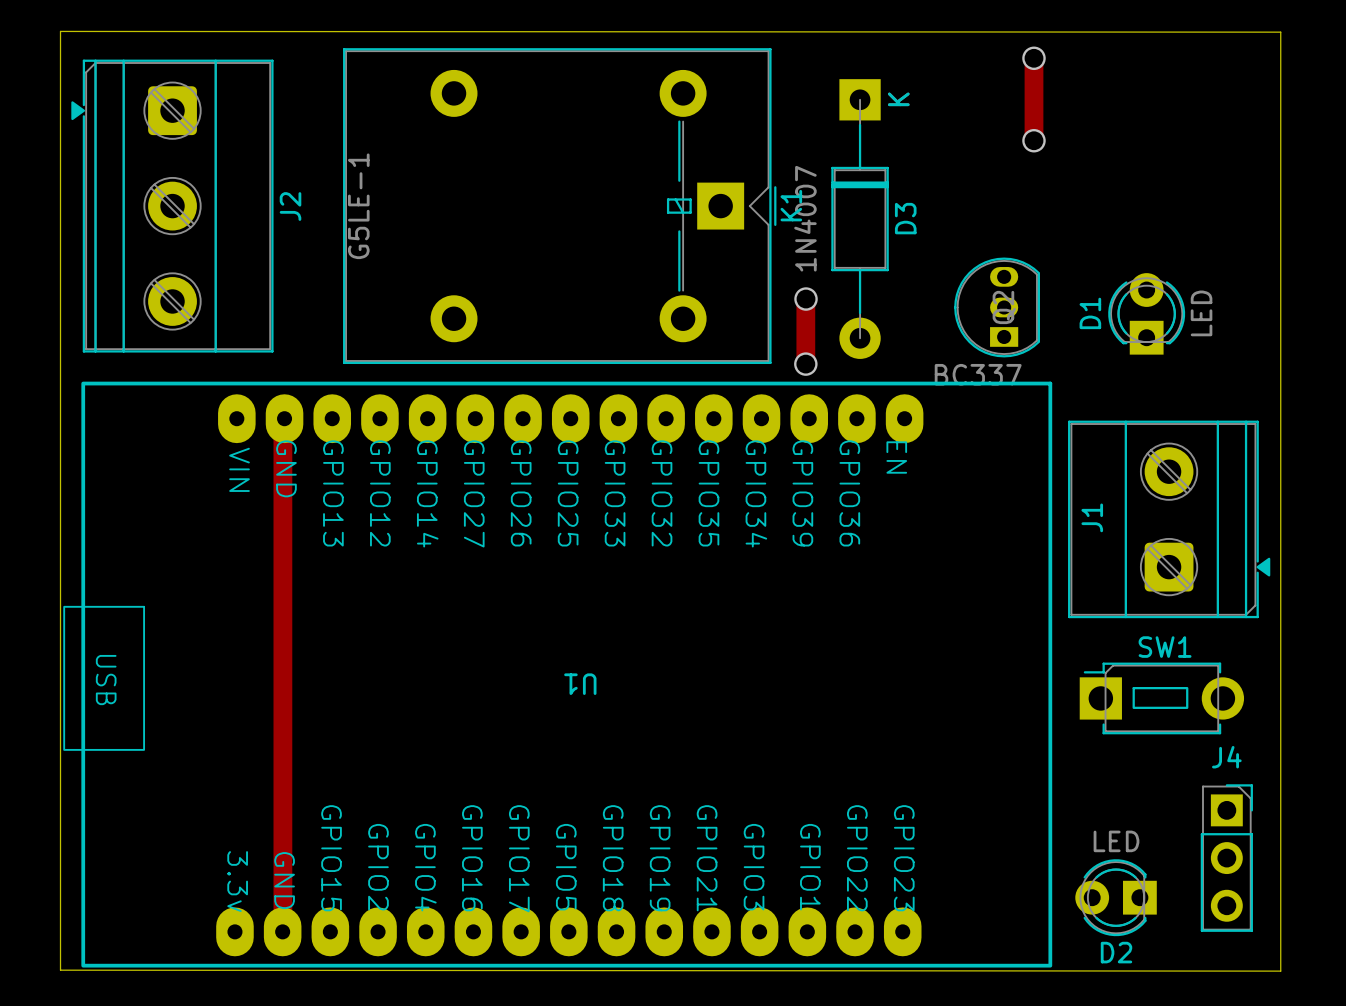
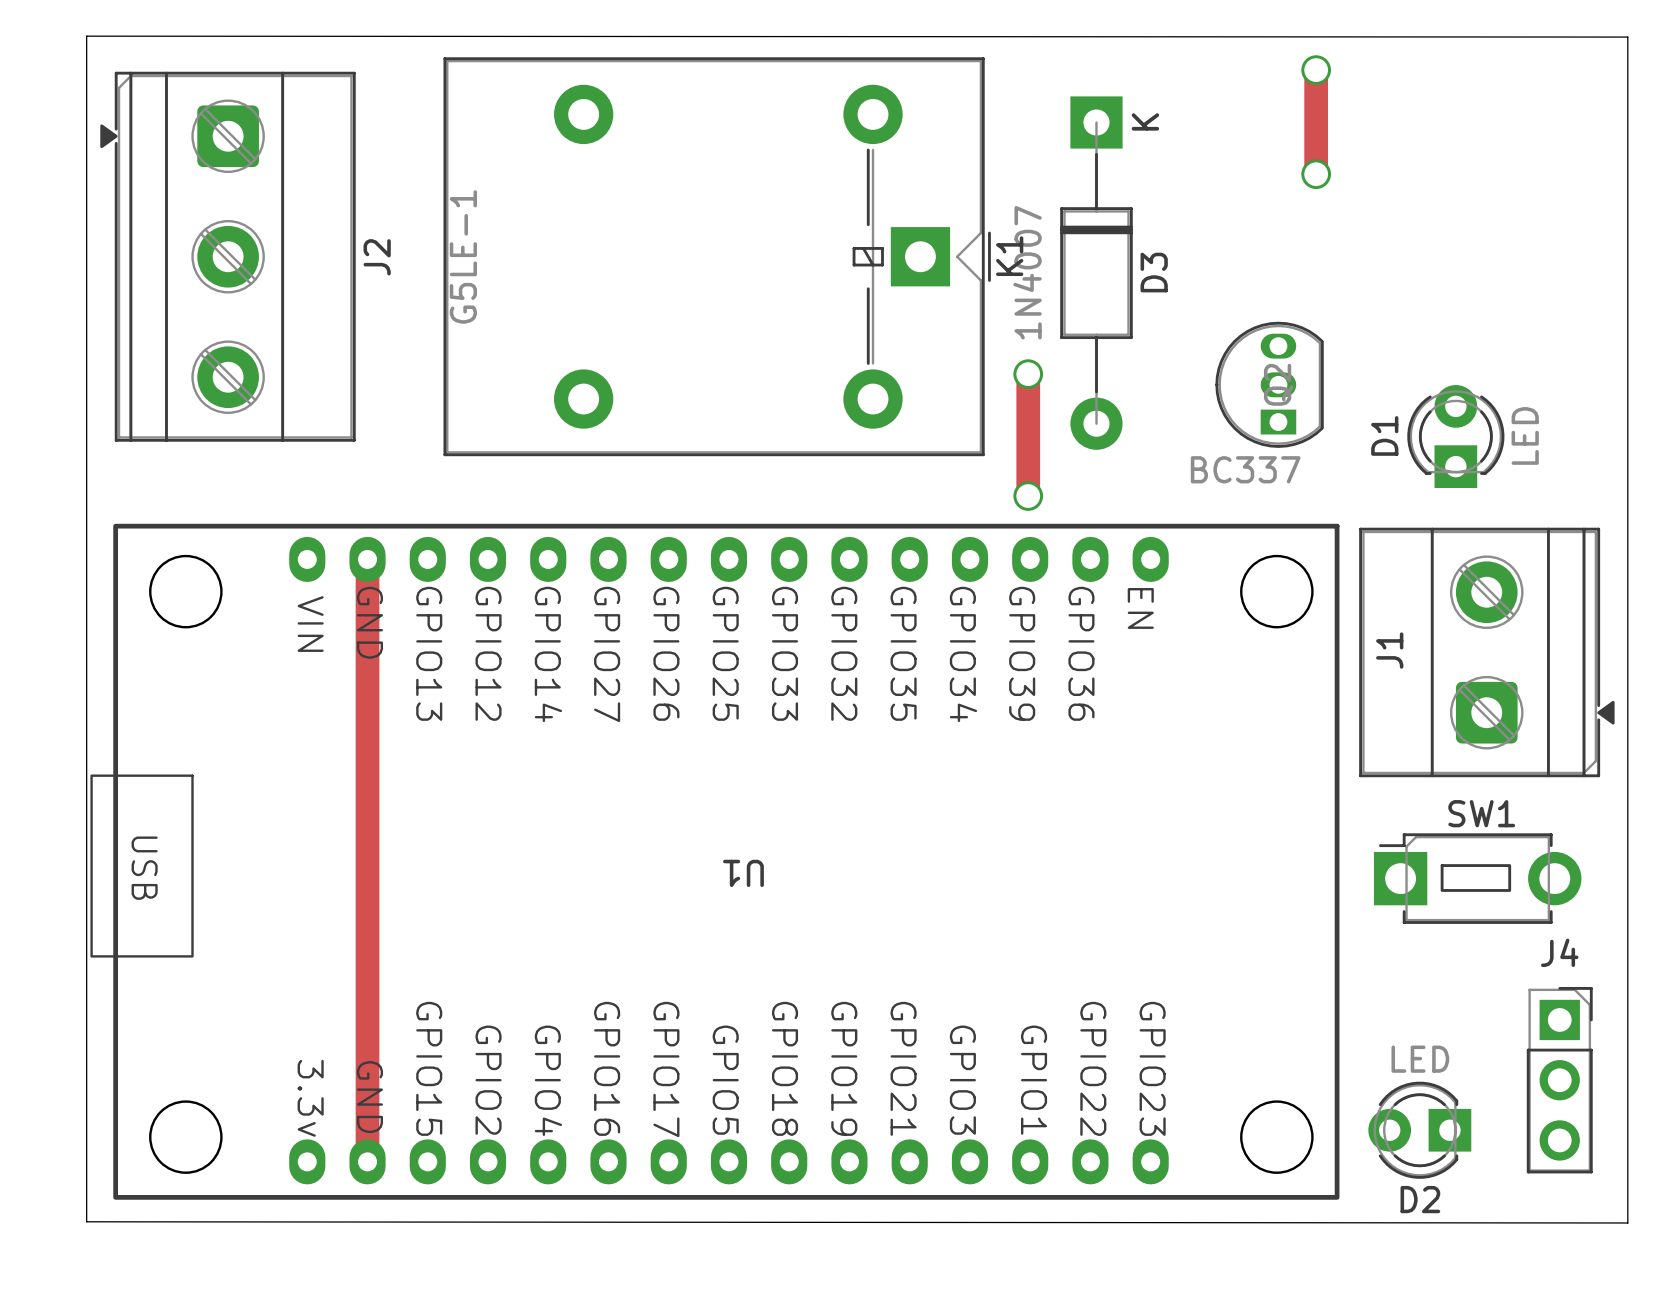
track: (805, 299) (805, 364) -> (1028, 374) (1028, 496)
D1 position: (1146, 313) -> (1455, 436)
via position: (805, 364) -> (1028, 496)
U1 footprint: [63, 381, 1053, 968] -> [90, 523, 1340, 1200]

